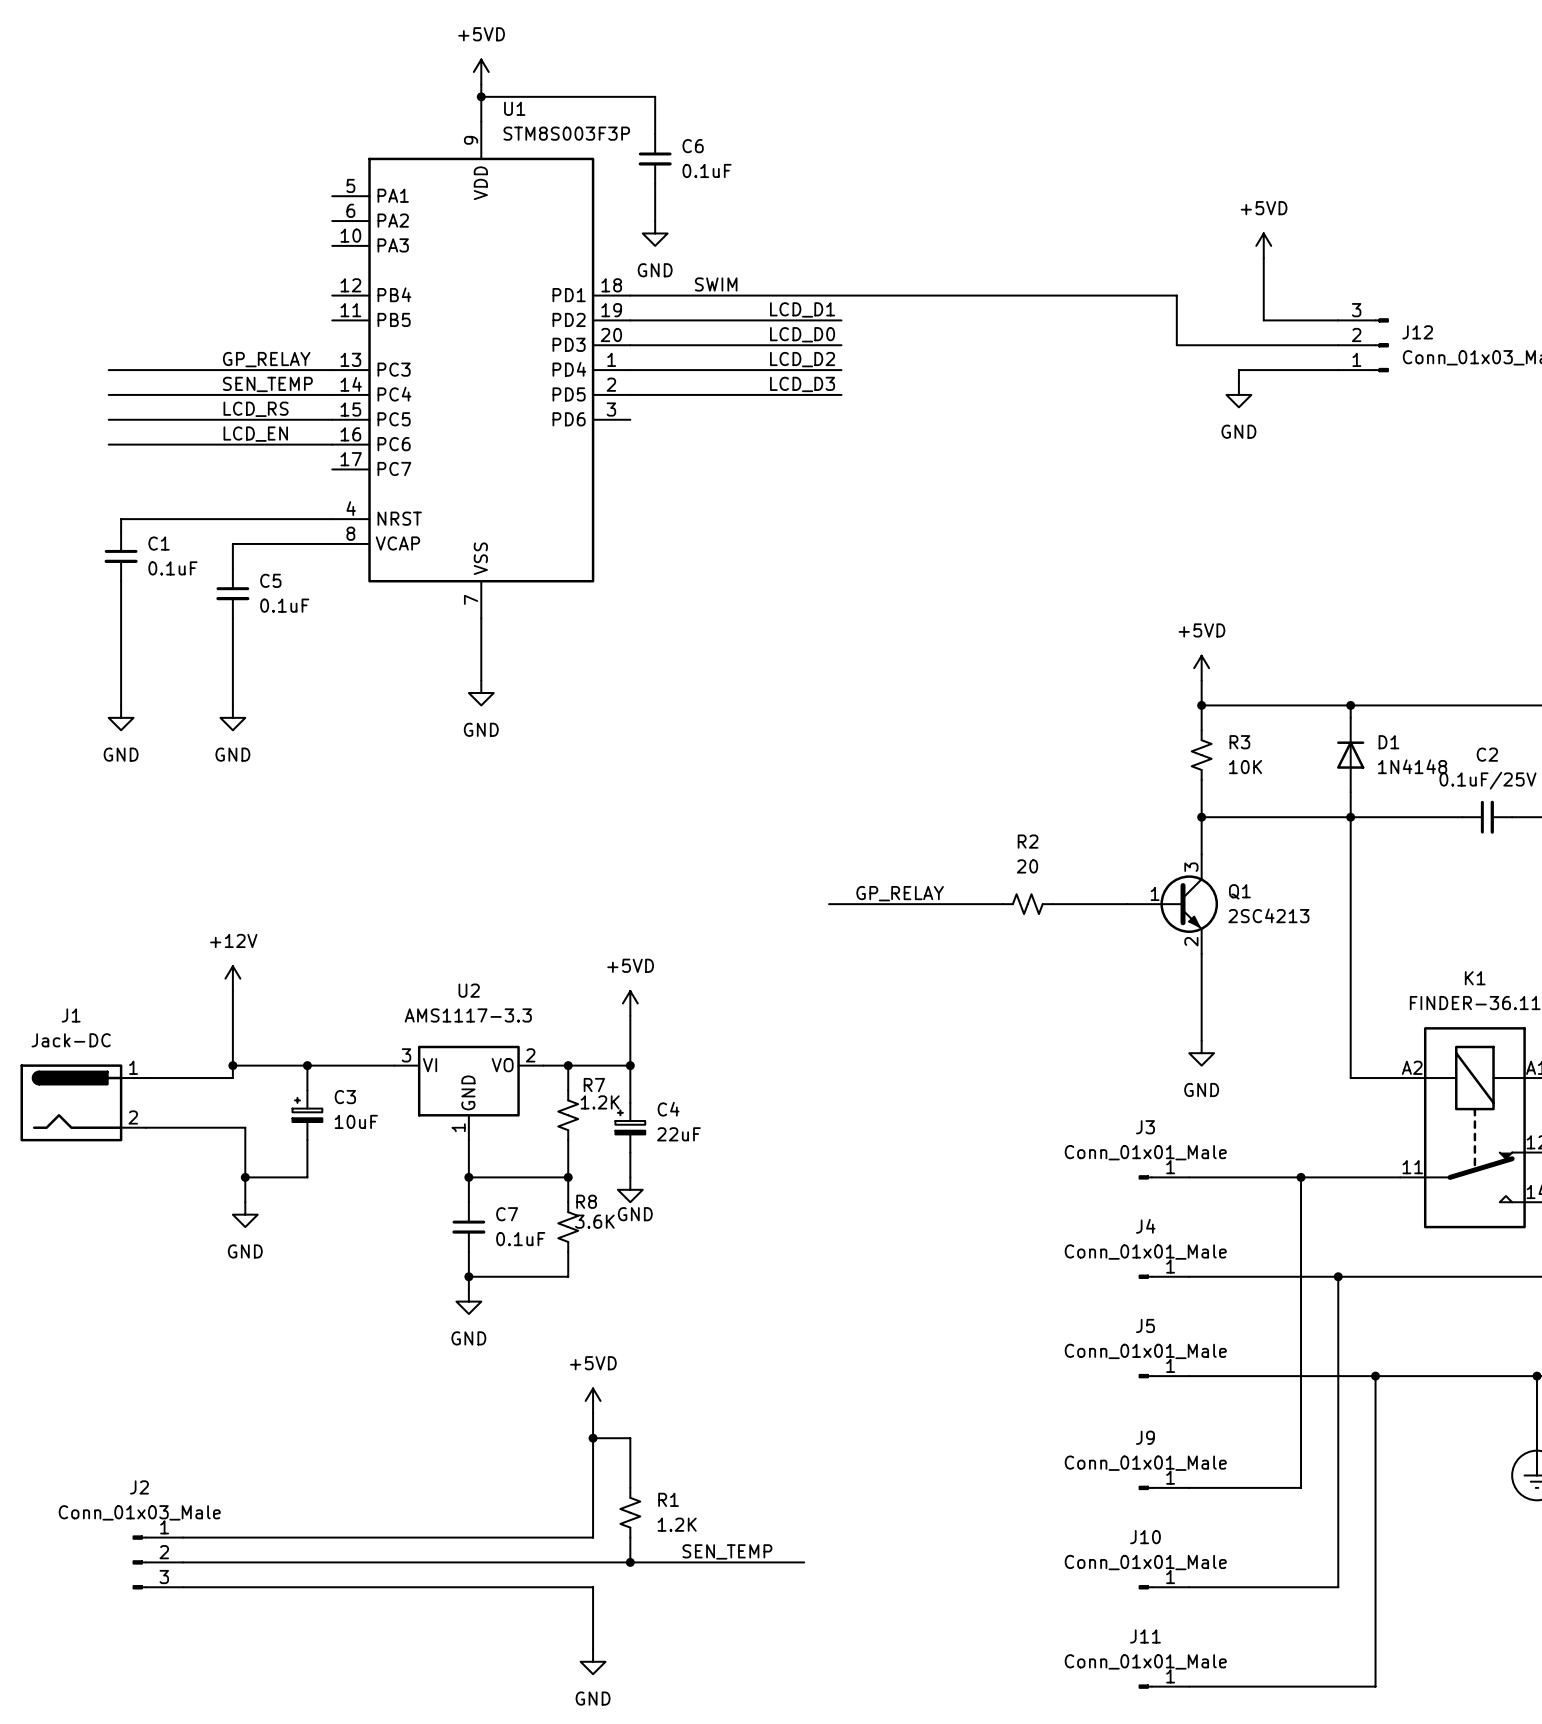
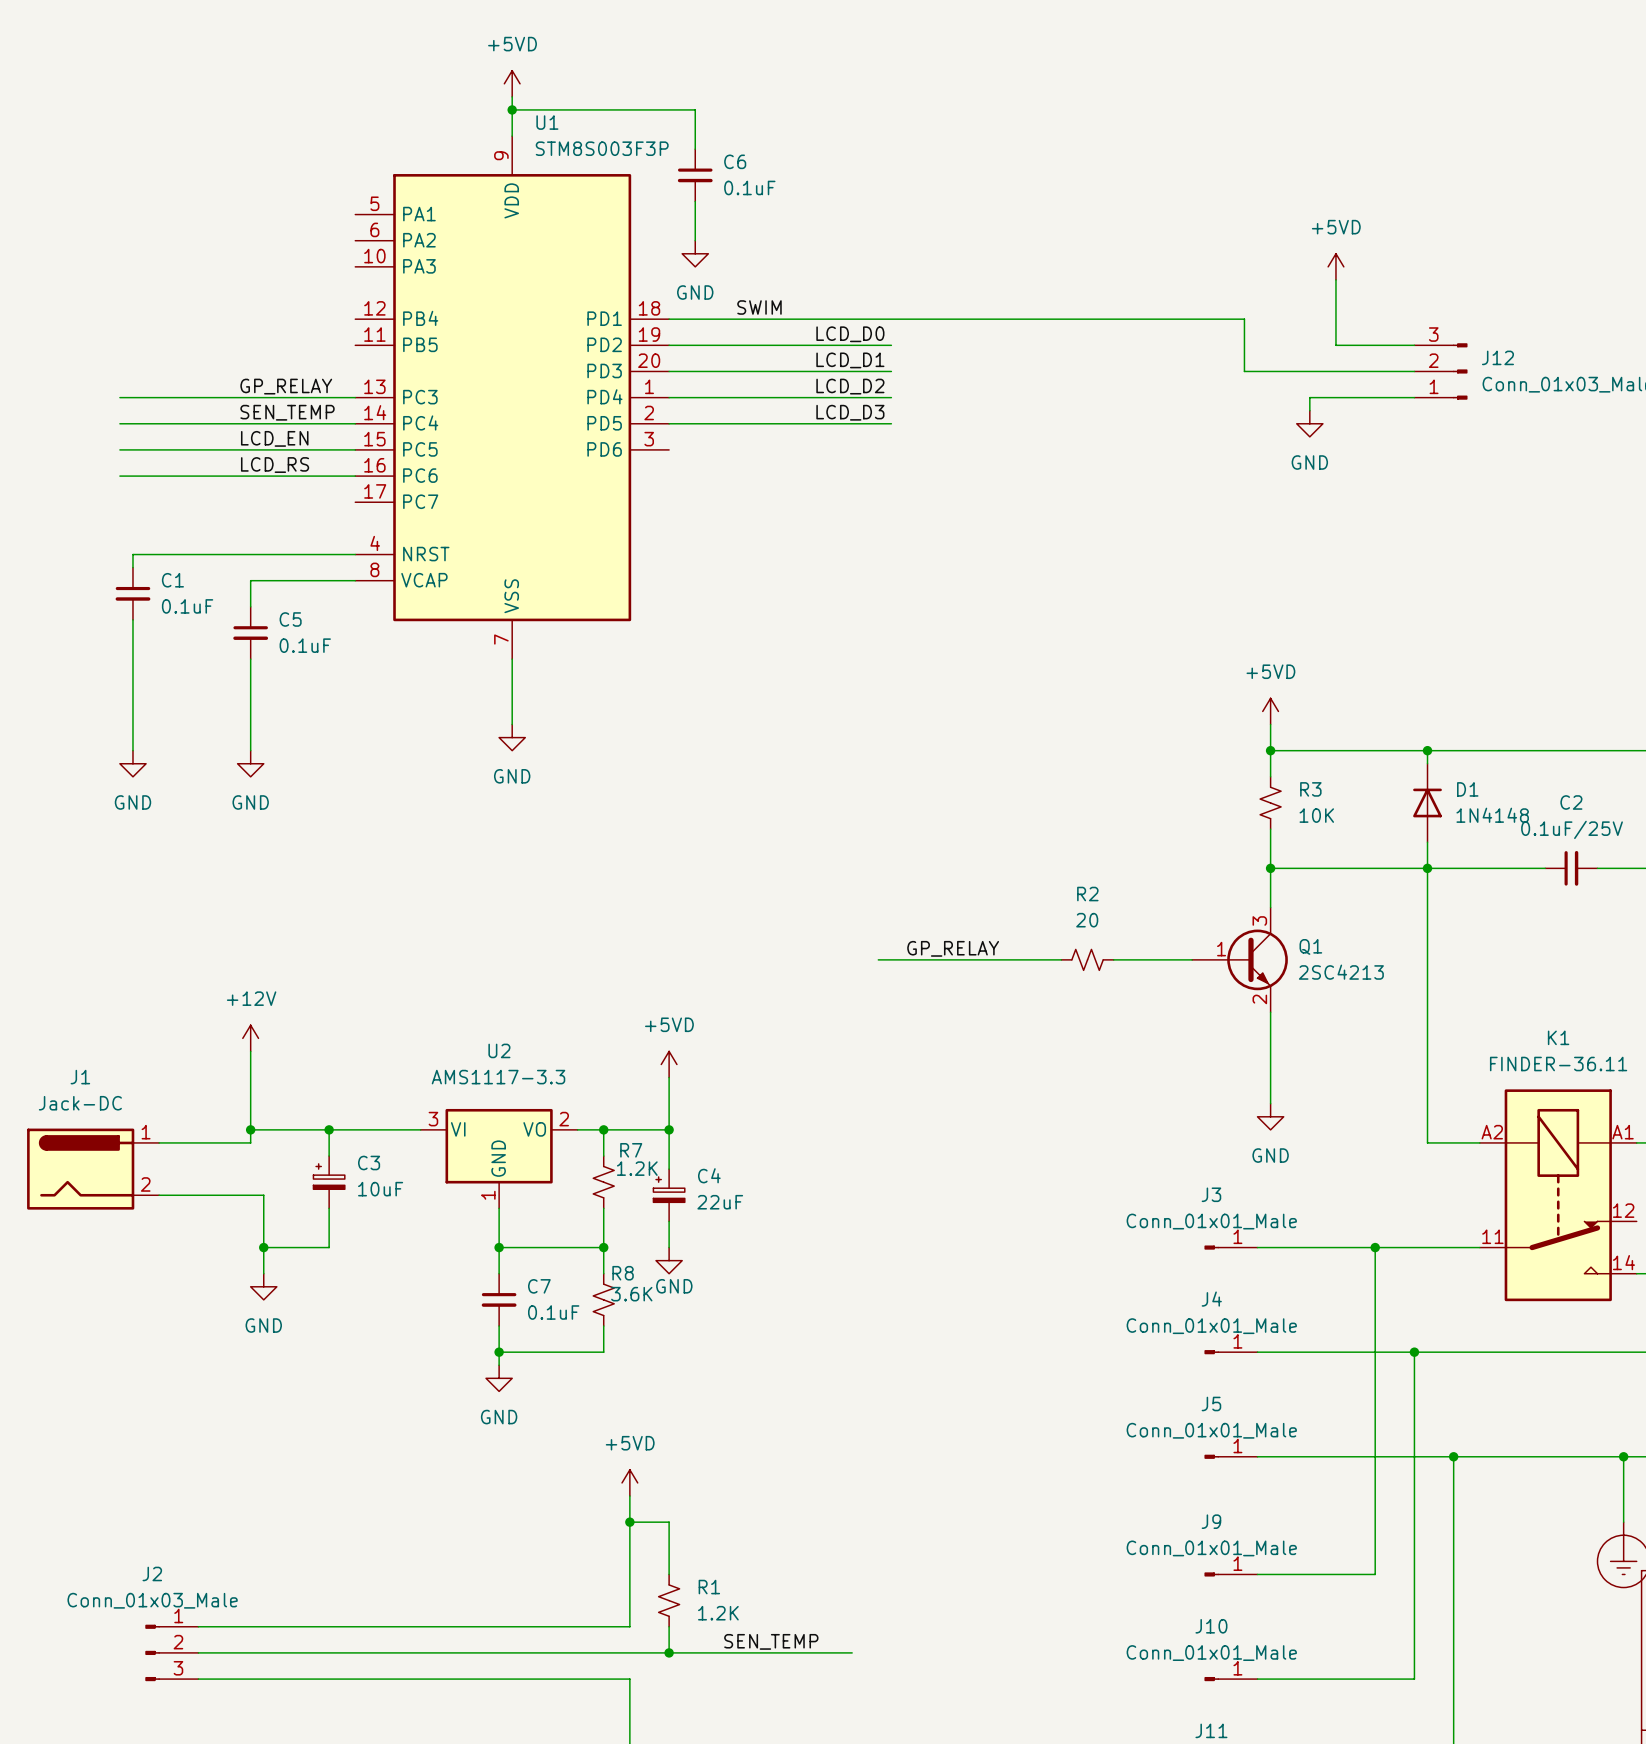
label: LCD_D1 (802, 309) -> LCD_D0 (850, 334)
label: LCD_D0 (802, 334) -> LCD_D1 (850, 360)
label: LCD_RS (256, 409) -> LCD_EN (274, 438)
label: LCD_EN (255, 434) -> LCD_RS (275, 465)

